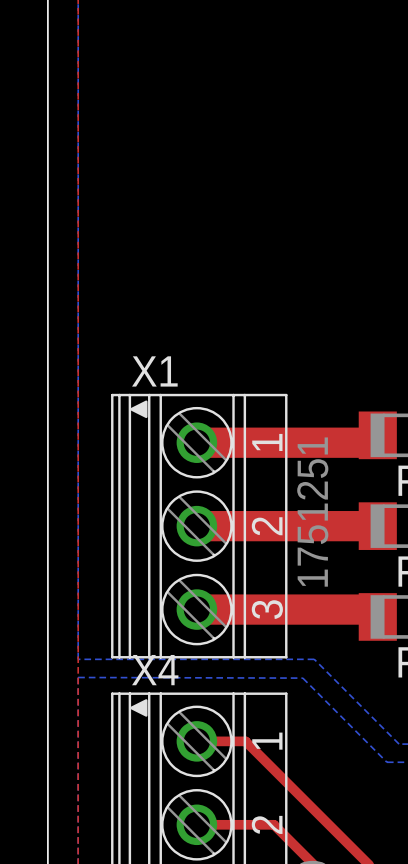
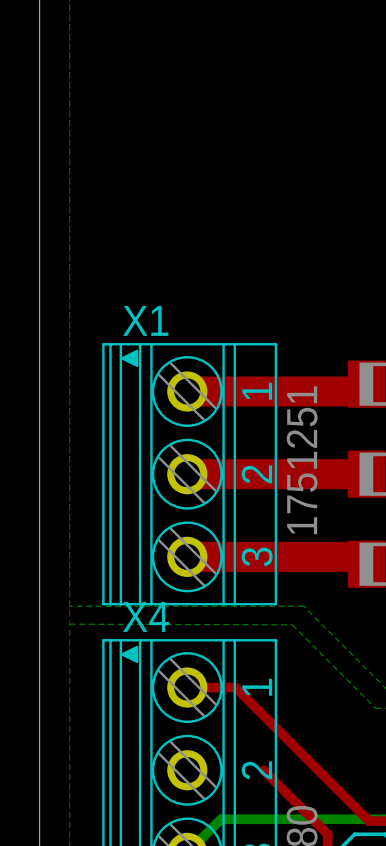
top track: (196, 824) (273, 824) -> none

